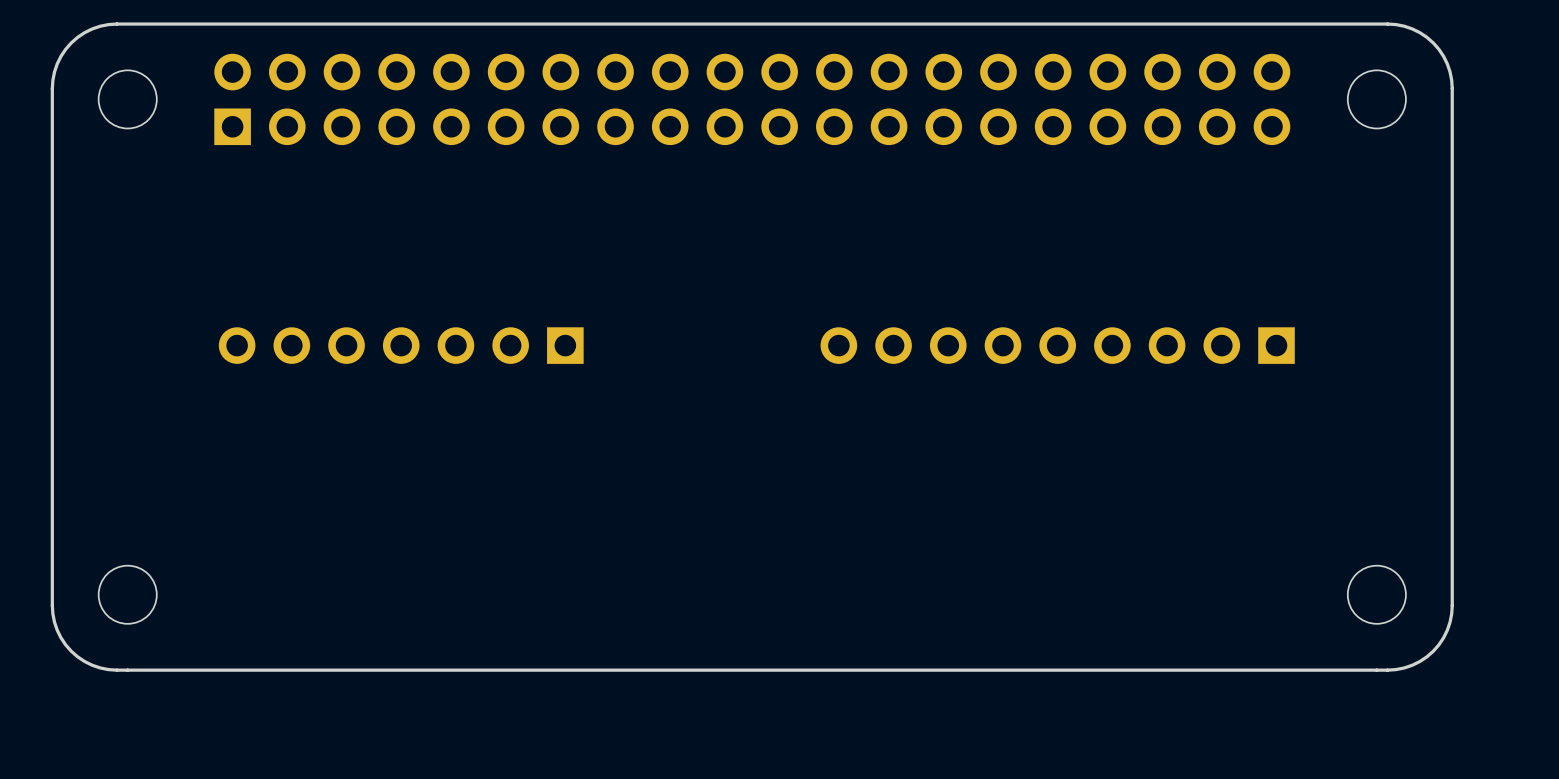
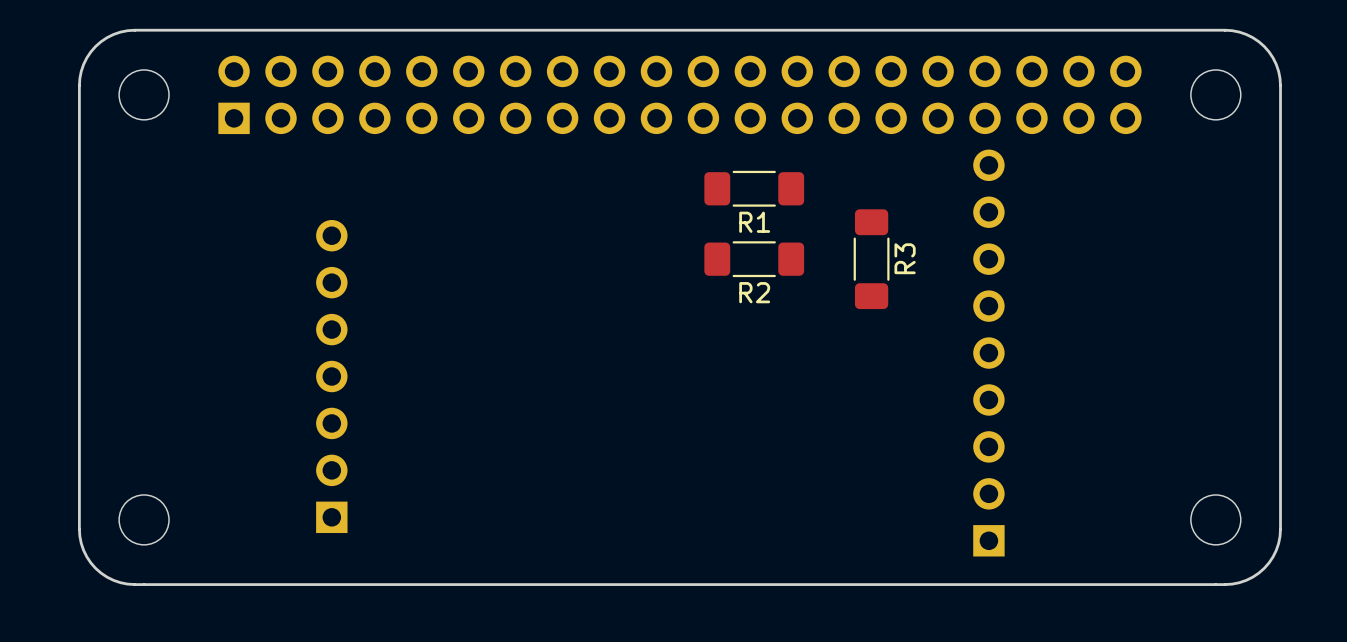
R1: none -> (754, 188)
R2: none -> (754, 259)
R3: none -> (871, 259)
part rotation: 0° (401, 345) -> 90° clockwise (331, 376)
part rotation: 0° (1057, 345) -> 90° clockwise (988, 353)

